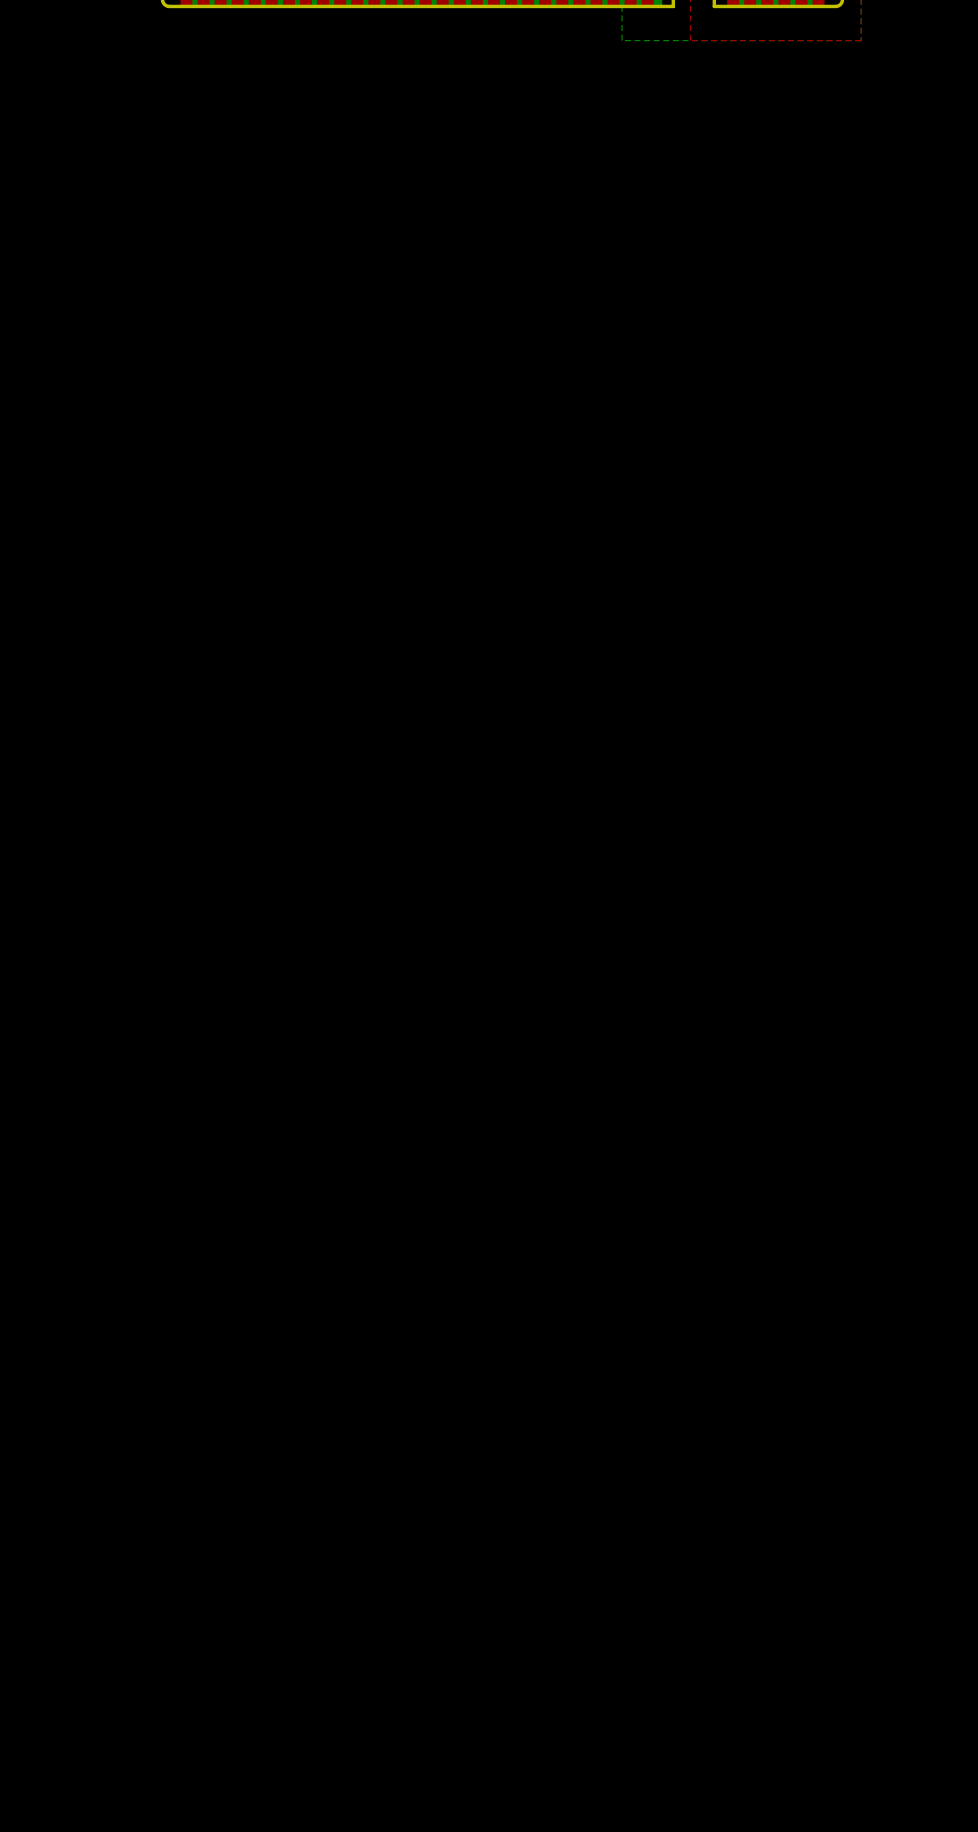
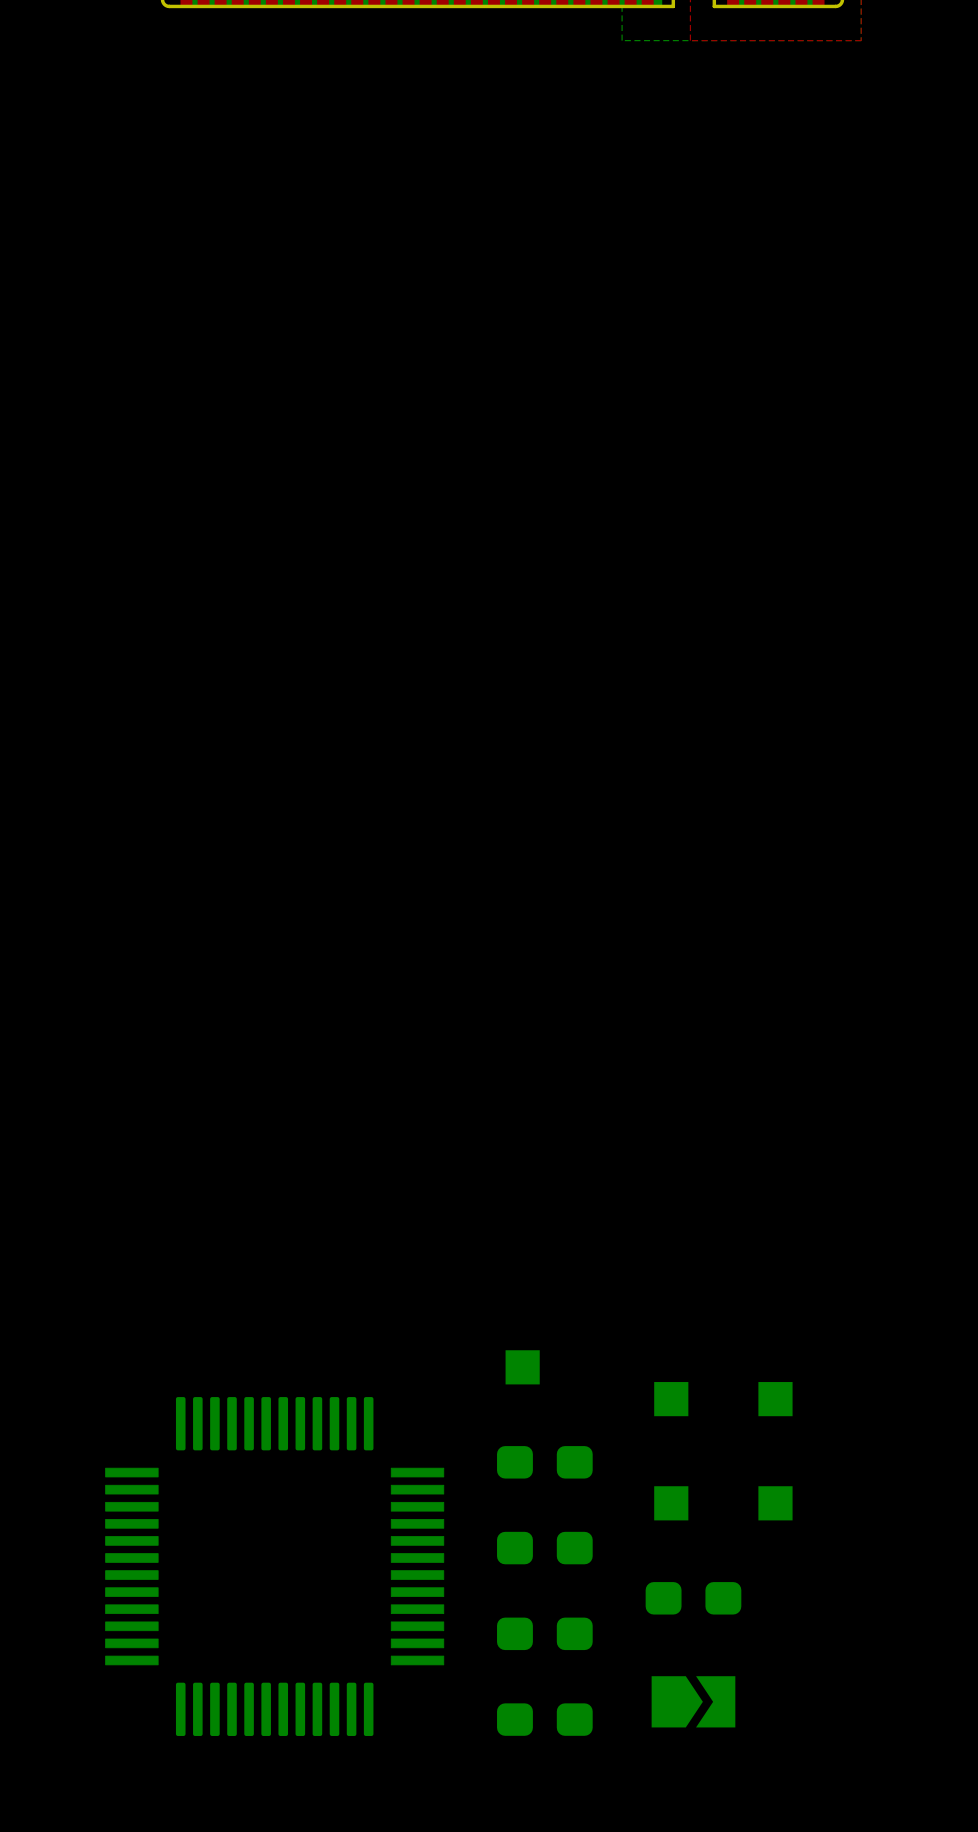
part: none -> (522, 1367)
part: none -> (671, 1399)
part: none -> (775, 1399)
part: none -> (544, 1462)
part: none -> (671, 1503)
part: none -> (775, 1503)
part: none -> (544, 1548)
part: none -> (274, 1566)
part: none -> (693, 1598)
part: none -> (544, 1633)
part: none -> (693, 1701)
part: none -> (544, 1719)

